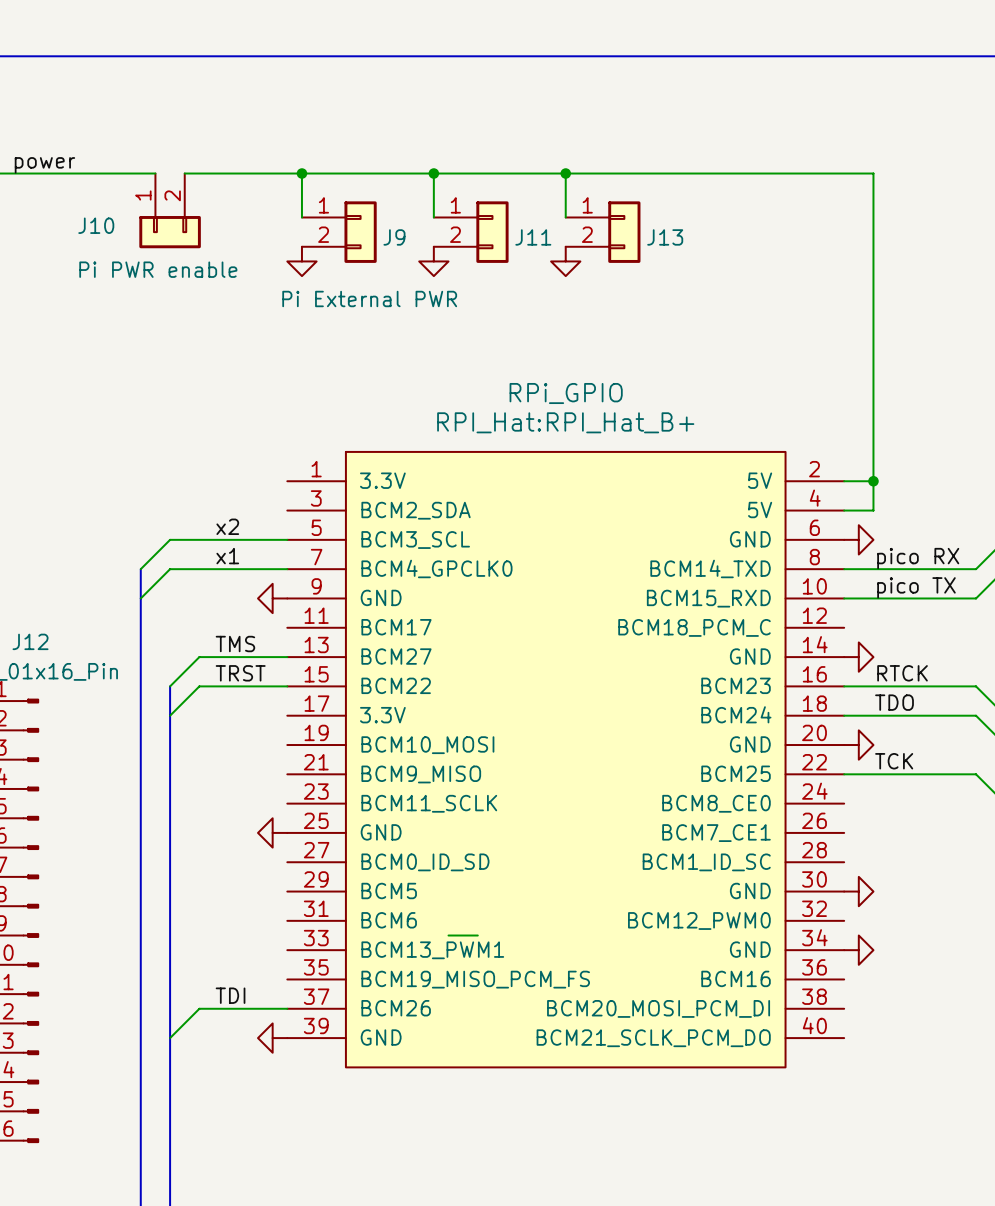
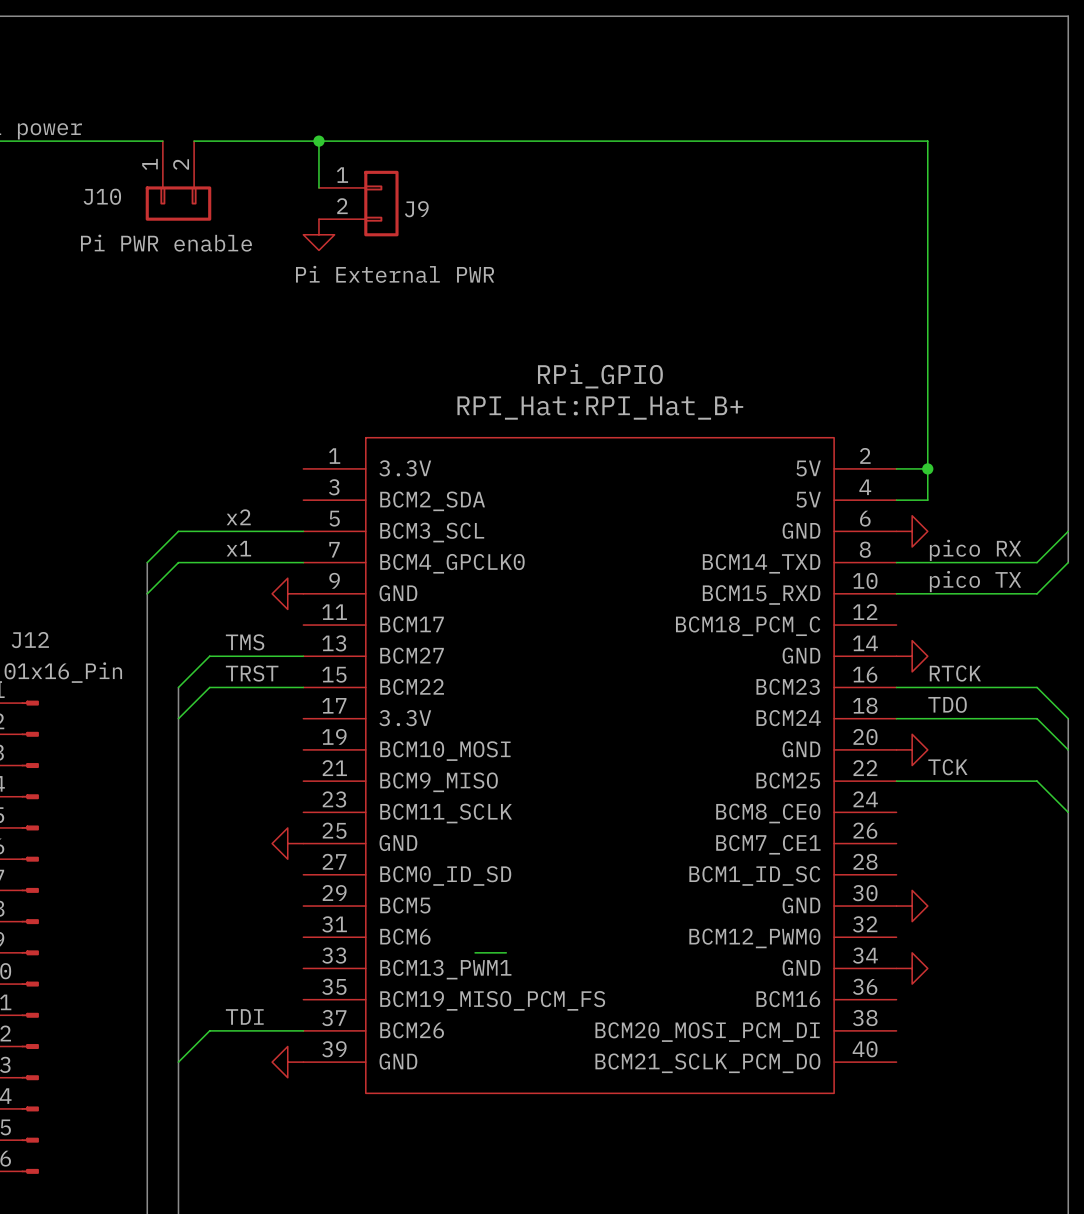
wire: (433, 173) (433, 217) -> none
junction: (433, 173) -> none
wire: (565, 173) (565, 217) -> none
junction: (565, 173) -> none
J11: (471, 232) -> none
J13: (603, 232) -> none
power symbol: (433, 261) -> none
power symbol: (565, 261) -> none

